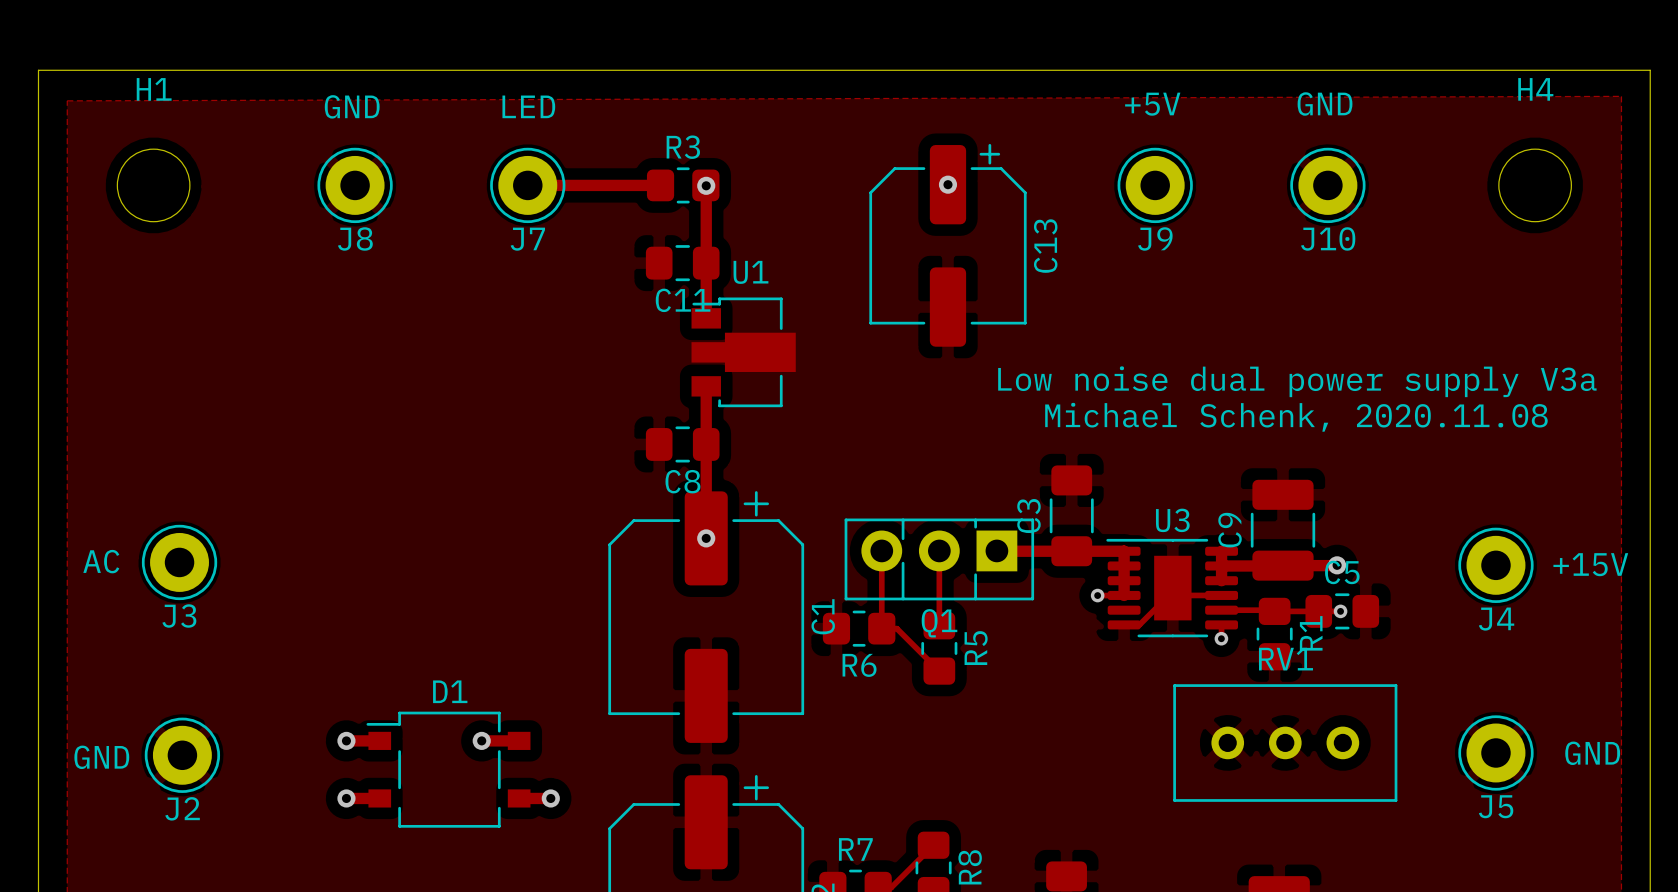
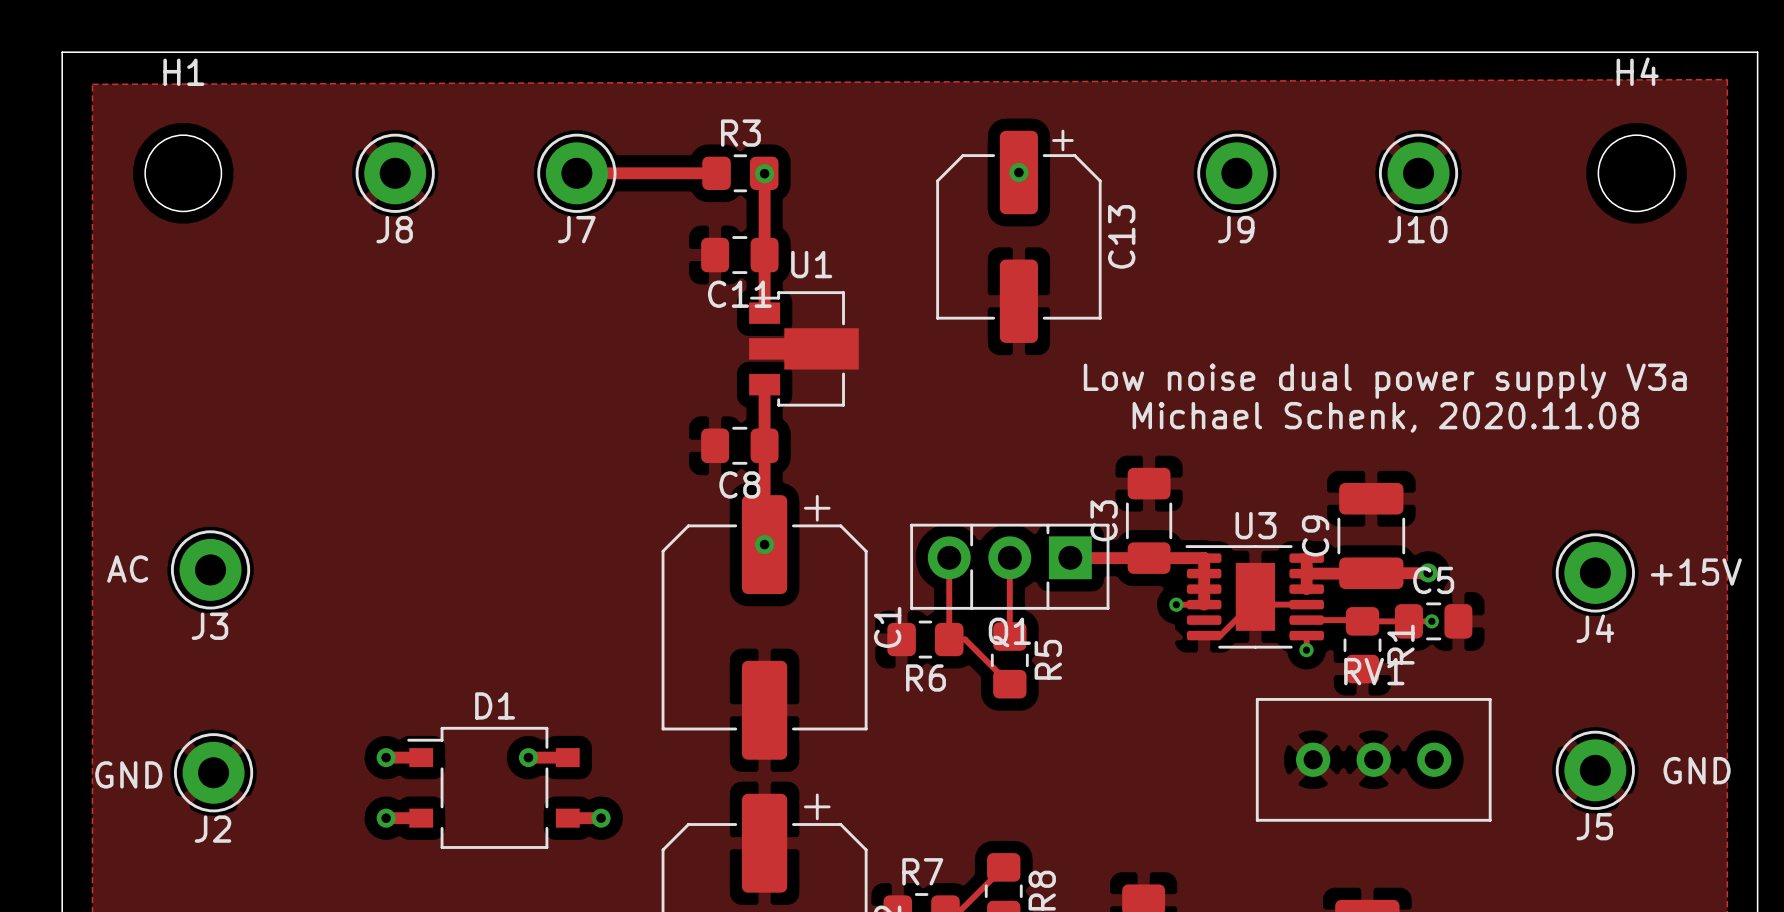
text: GND (1325, 103) -> none
text: +5V (1152, 104) -> none
text: GND (352, 106) -> none
text: LED (528, 106) -> none

